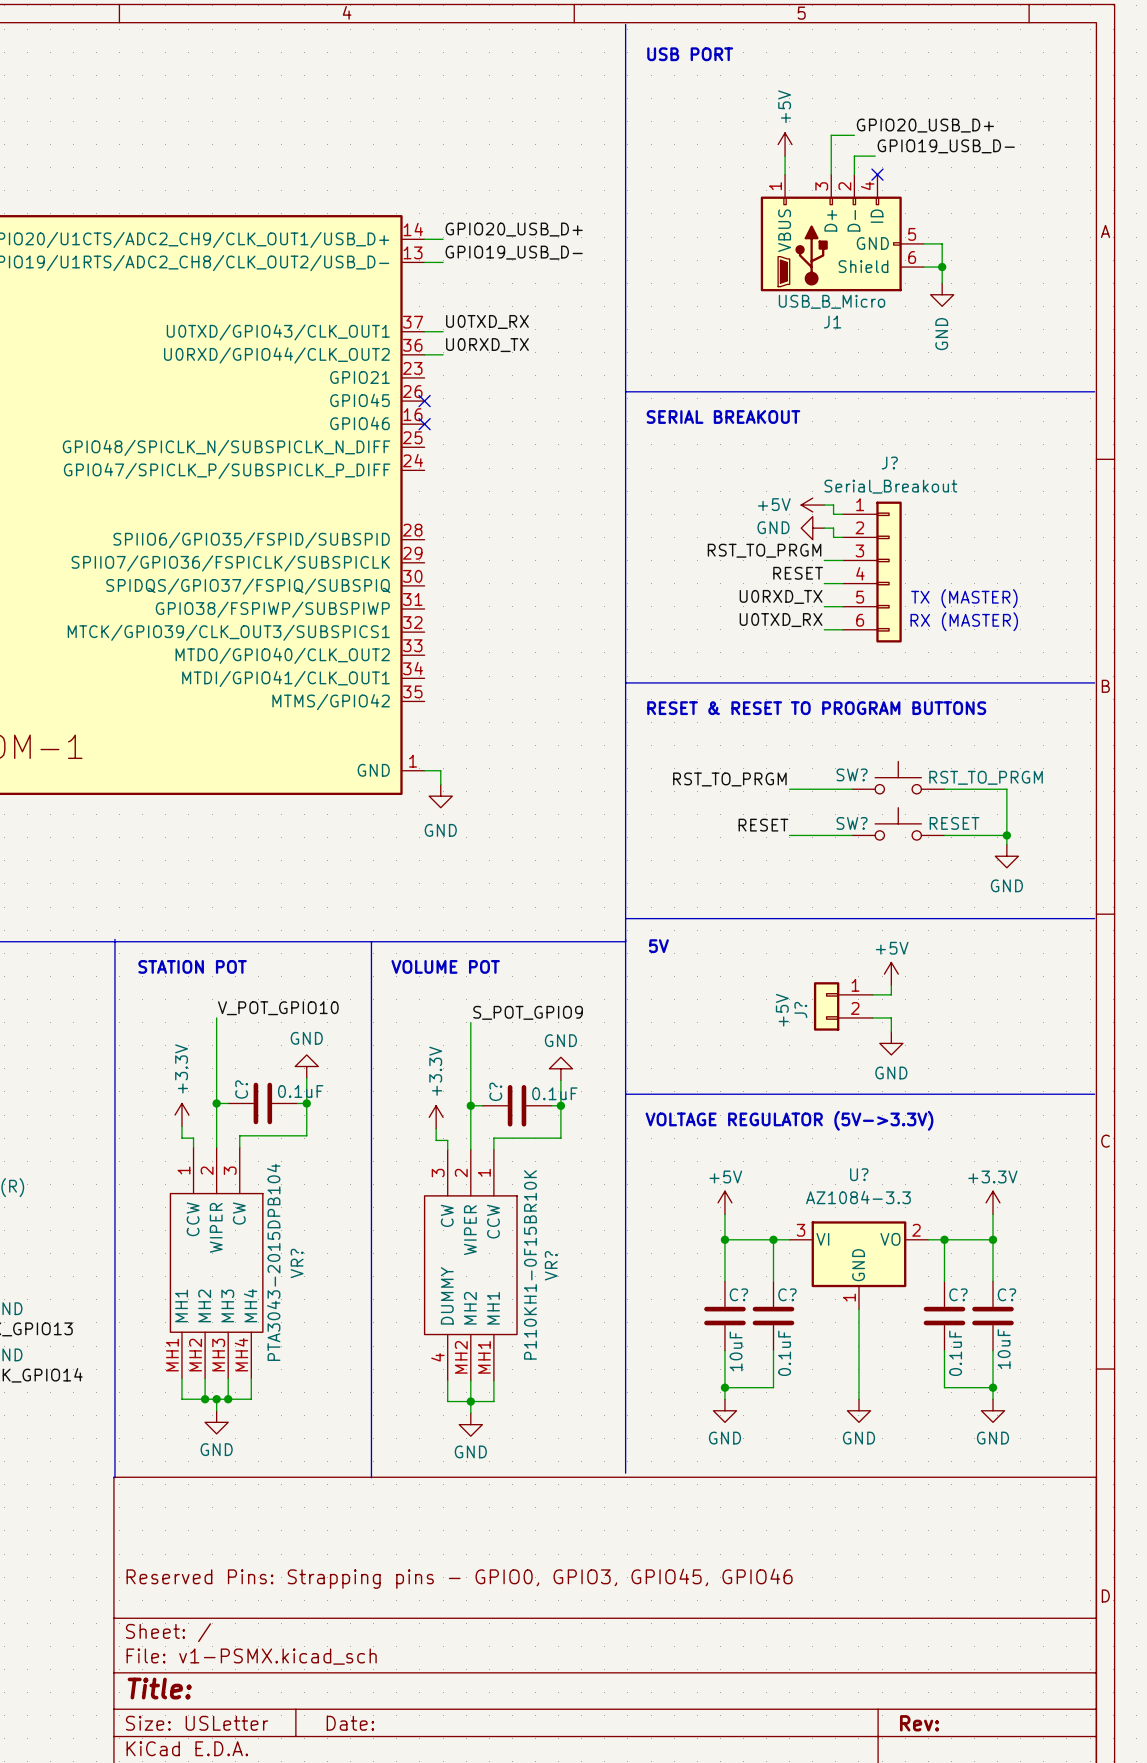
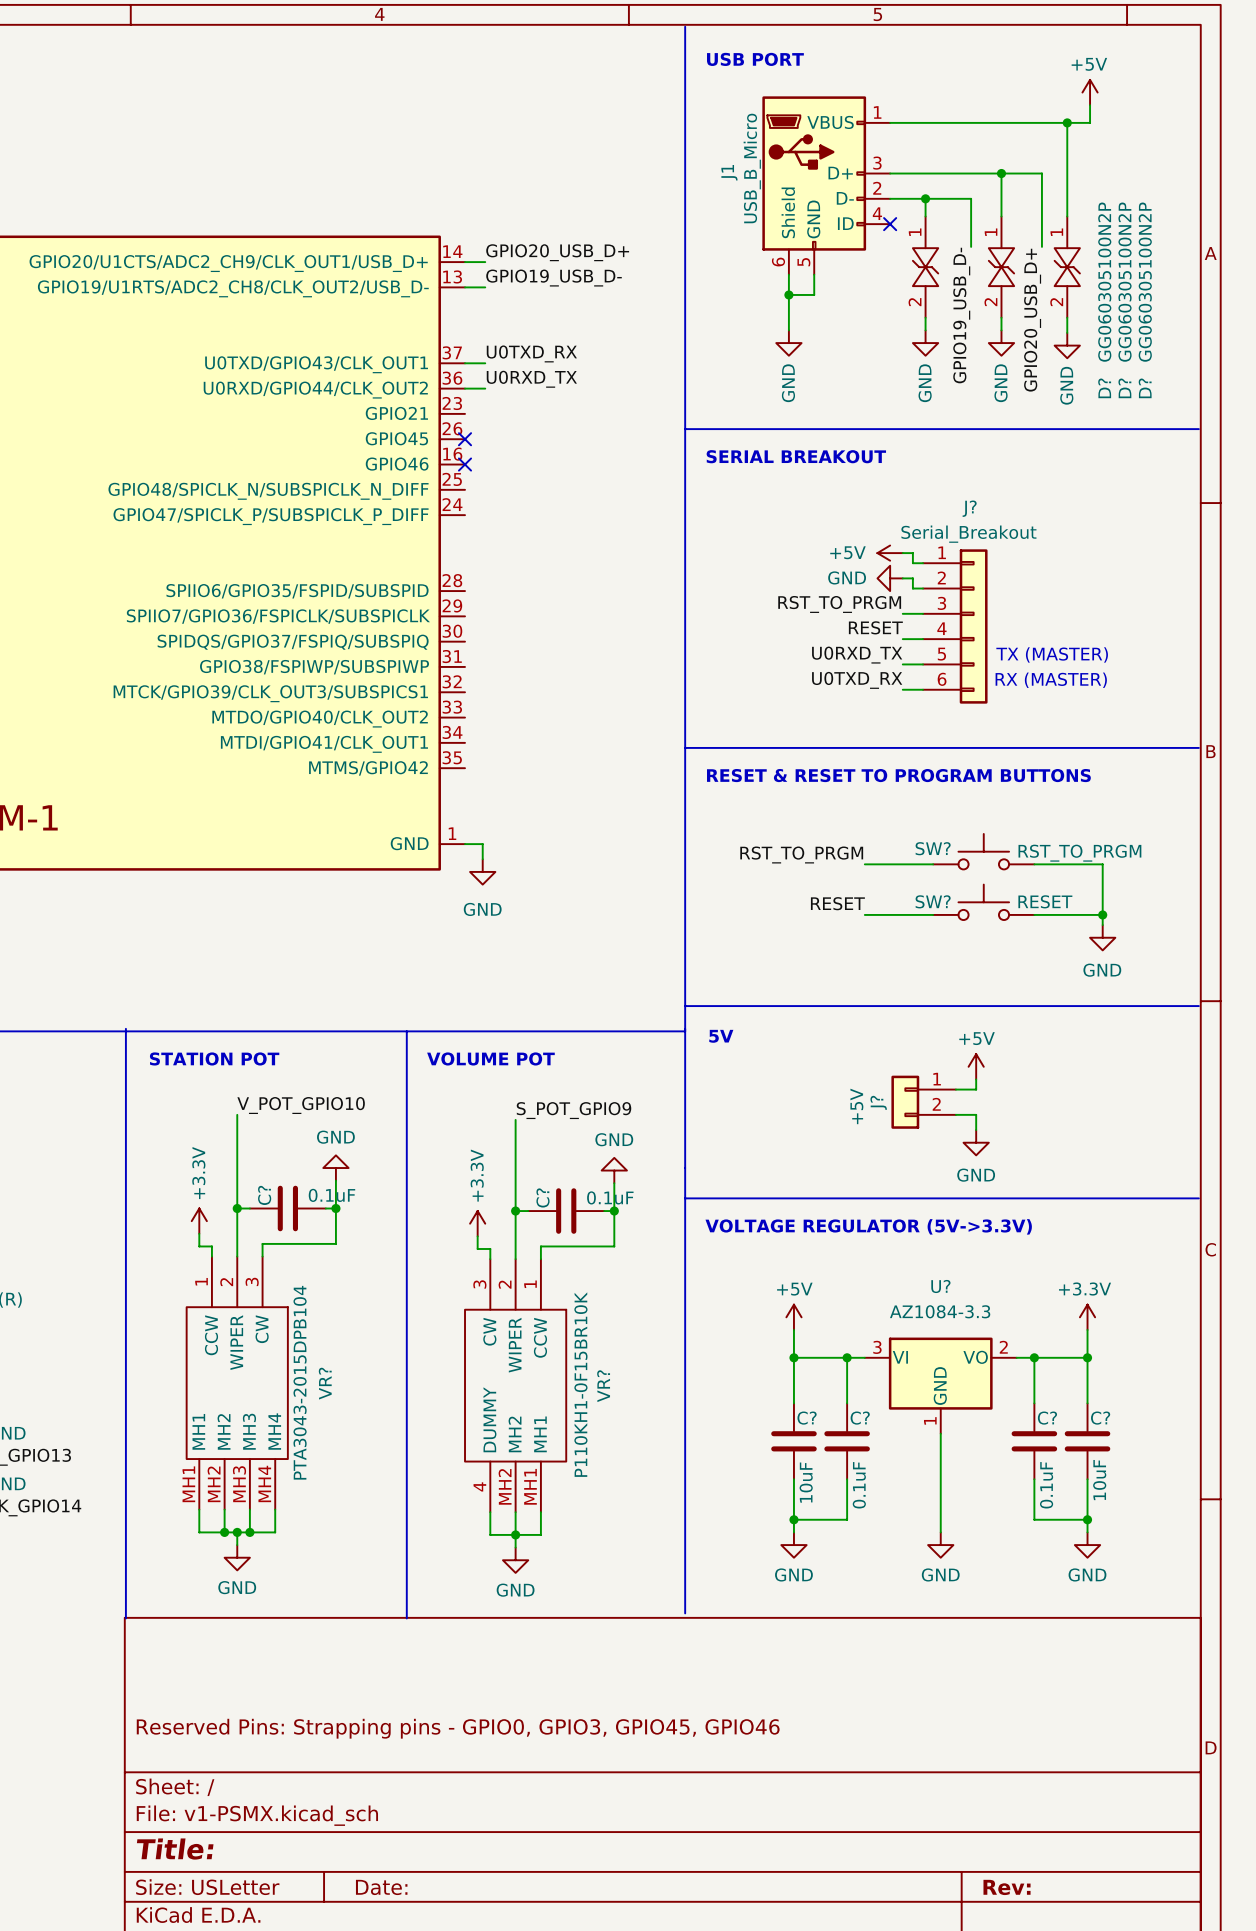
wire: none -> (1090, 105) (1090, 122) (890, 122)
power symbol text rotation: 0° (784, 106) -> 90° clockwise (1089, 64)
wire: none -> (1067, 122) (1067, 216)
junction: none -> (1067, 122)
label rotation: 0° (925, 125) -> 90° counterclockwise (1032, 320)
label position: GPIO20_USB_D+ (925, 125) -> GPIO20_USB_D+ (1032, 320)
wire: (854, 135) (831, 135) (831, 174) -> none
power symbol position: +5V (785, 144) -> +5V (1090, 92)
label rotation: 0° (946, 146) -> 90° counterclockwise (961, 315)
label position: GPIO19_USB_D- (946, 146) -> GPIO19_USB_D- (961, 315)
wire: (875, 156) (854, 156) (854, 174) -> none
wire: none -> (890, 173) (1041, 173) (1041, 246)
wire: none -> (1001, 173) (1001, 216)
junction: none -> (1001, 173)
no-connect mark: (877, 174) -> none
wire: none -> (890, 198) (971, 198) (971, 246)
wire: none -> (925, 198) (925, 216)
junction: none -> (925, 198)
no-connect mark: none -> (890, 224)
J1 position: (842, 232) -> (826, 185)
J1 rotation: 0° (831, 243) -> 90° clockwise (814, 173)
D?: none -> GG060305100N2P (925, 267)
D?: none -> GG060305100N2P (1001, 267)
wire: (923, 243) (942, 243) (942, 283) -> none
D?: none -> GG060305100N2P (1067, 267)
wire: none -> (788, 274) (788, 330)
wire: none -> (814, 274) (814, 294) (788, 294)
wire: (923, 267) (942, 267) -> none
junction: (942, 267) -> none
junction: none -> (788, 294)
wire: none -> (925, 317) (925, 330)
wire: none -> (1001, 317) (1001, 330)
wire: none -> (1067, 317) (1067, 332)
power symbol: GND (942, 294) -> none
power symbol: none -> GND (788, 343)
power symbol: none -> GND (925, 343)
power symbol: none -> GND (1001, 343)
power symbol: none -> GND (1067, 345)

